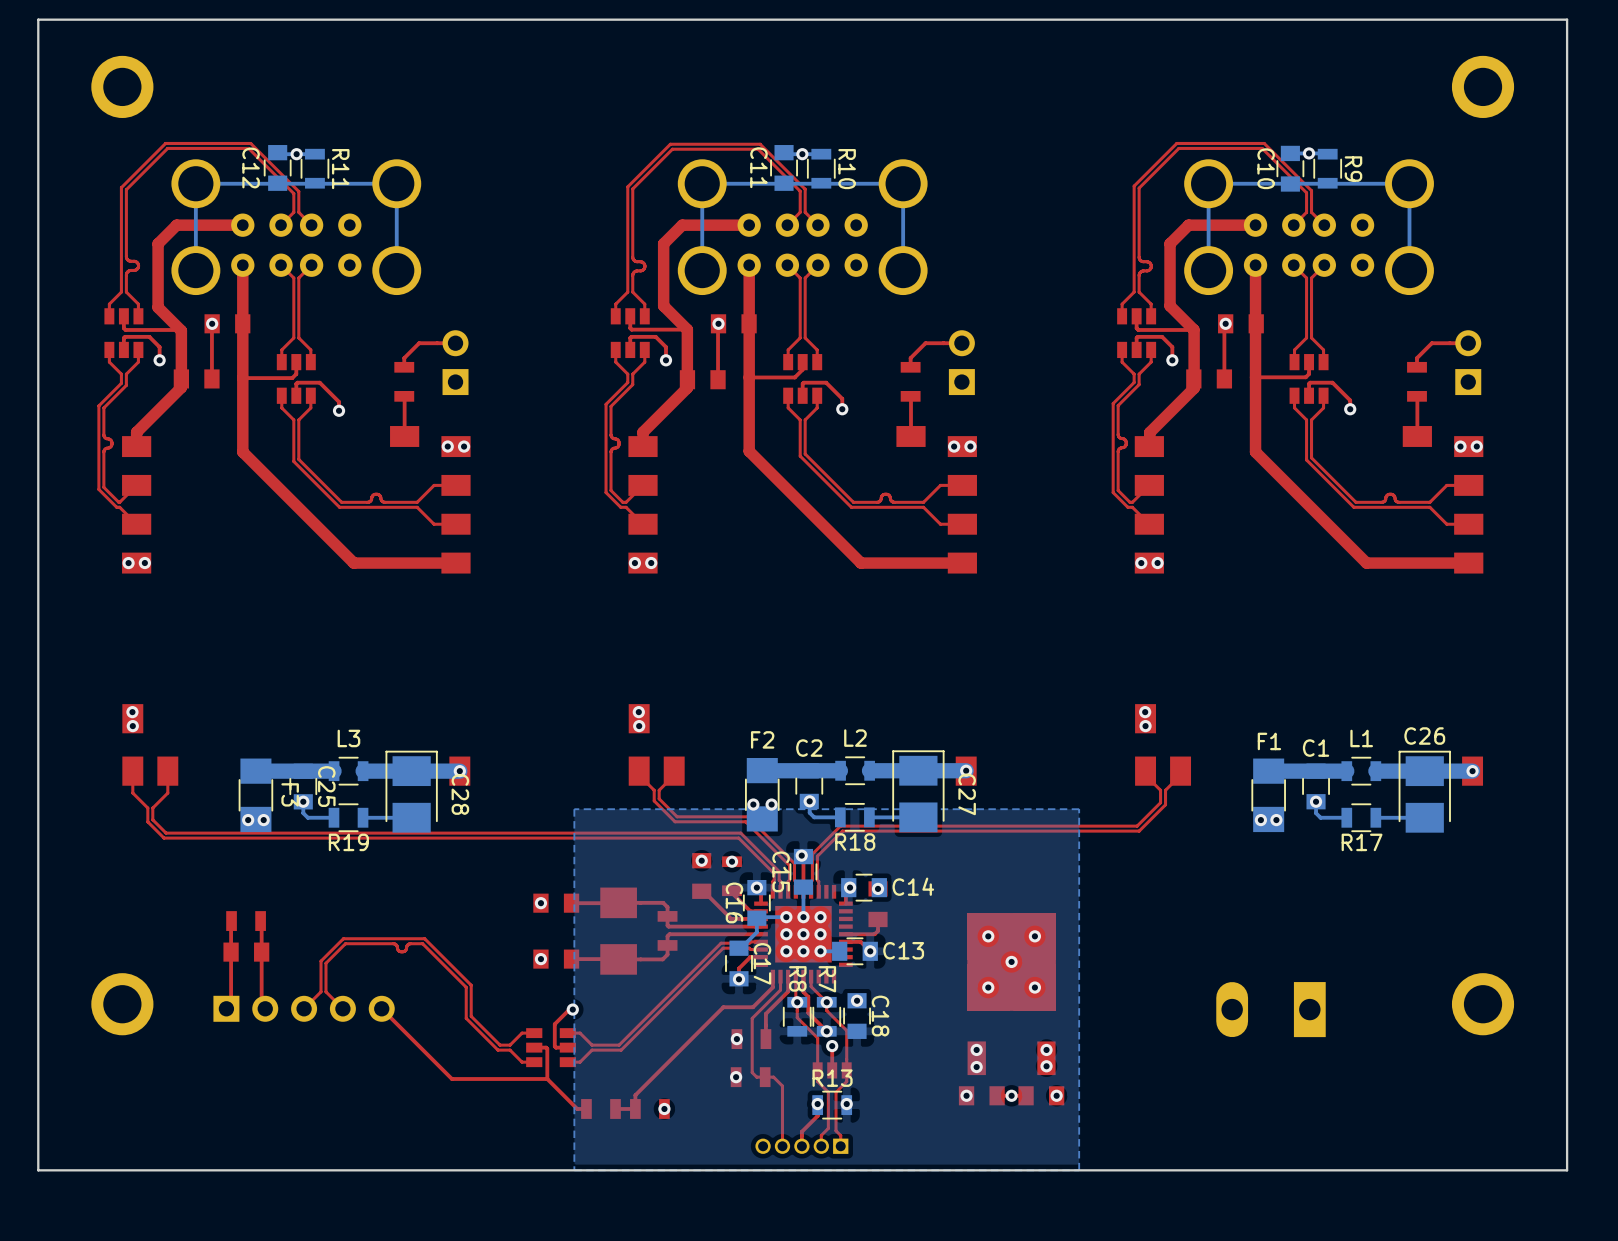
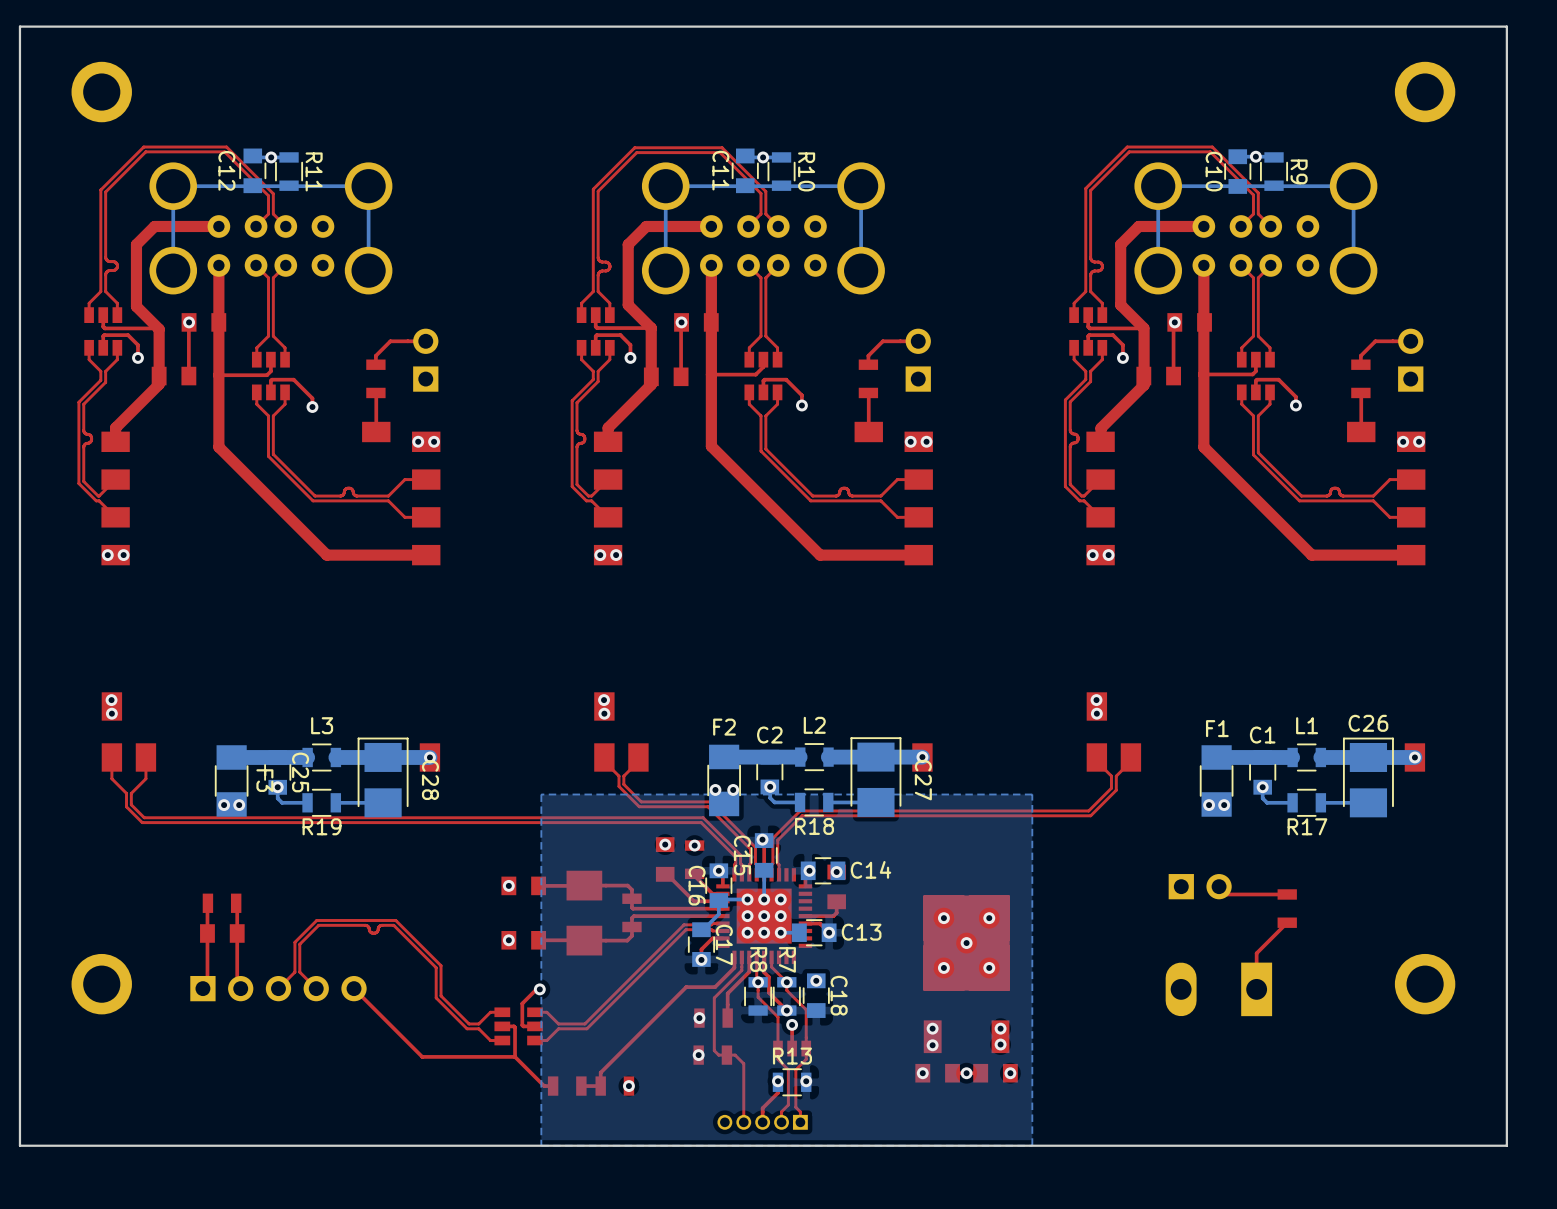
part: none -> (1200, 886)
top track: none -> (1219, 886) (1226, 894) (1287, 894)
part: none -> (1287, 908)
top track: none -> (1287, 922) (1256, 953) (1256, 989)

